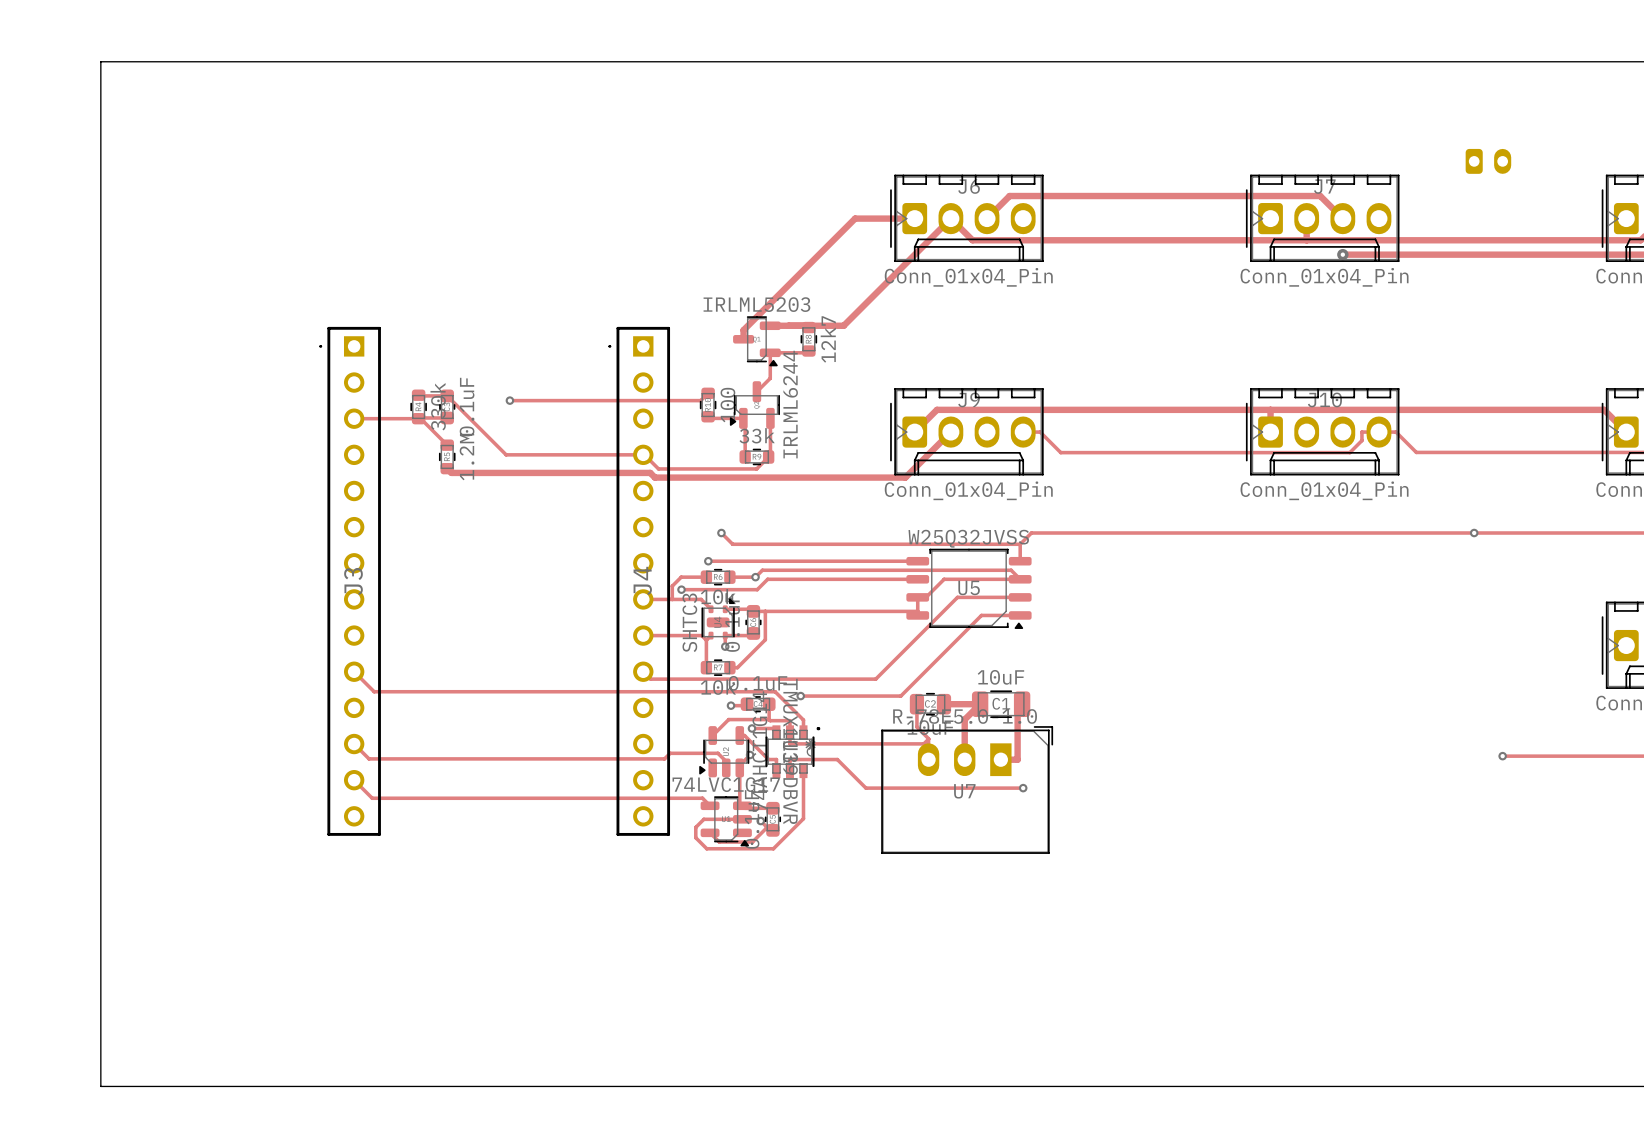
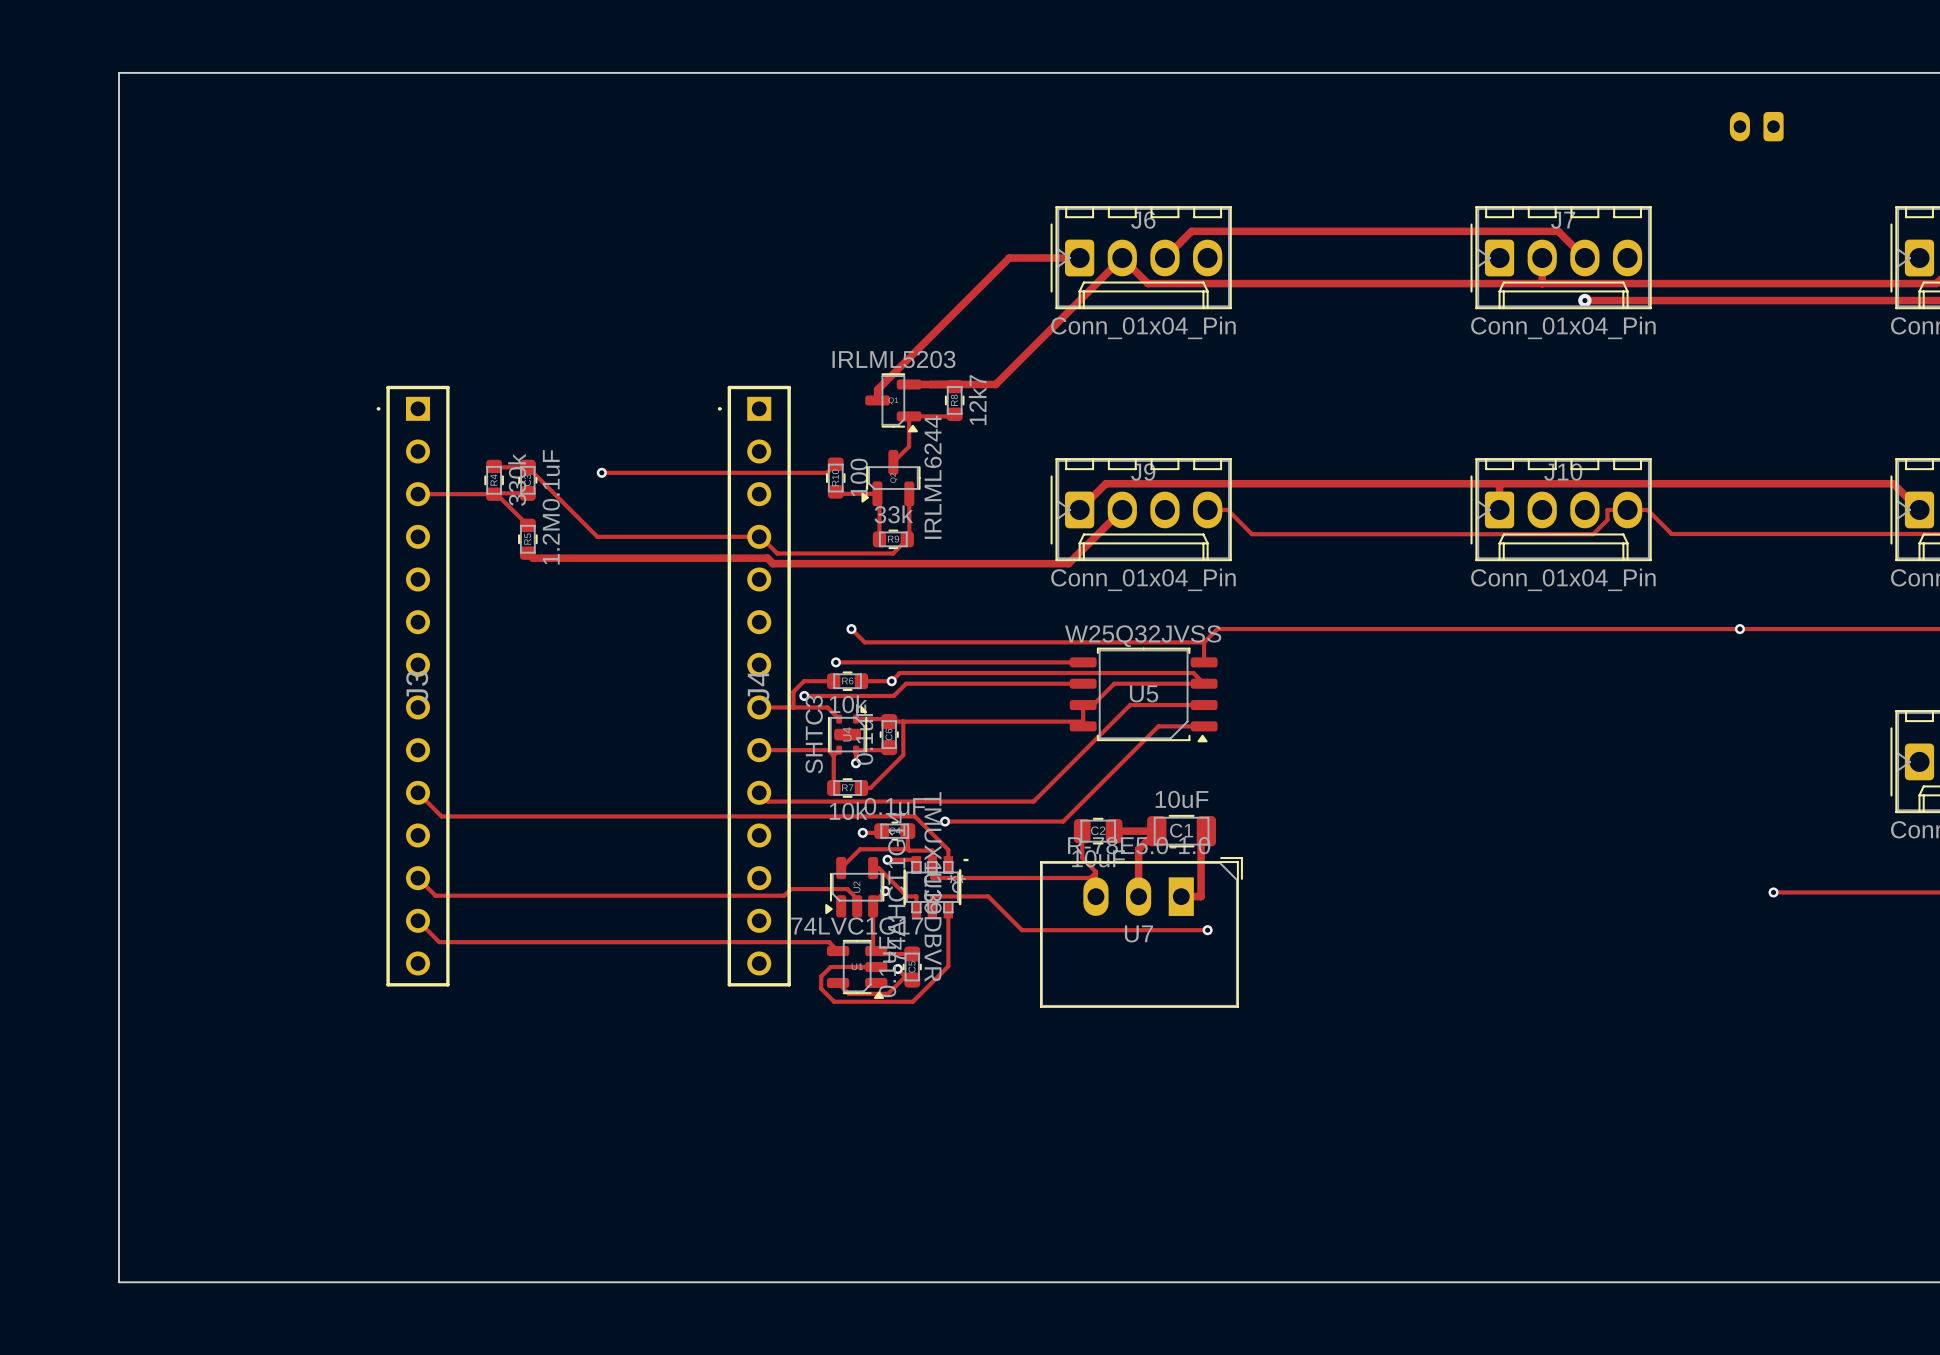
part rotation: 0° (1488, 161) -> 180° (1756, 126)
part position: (1488, 161) -> (1756, 126)

